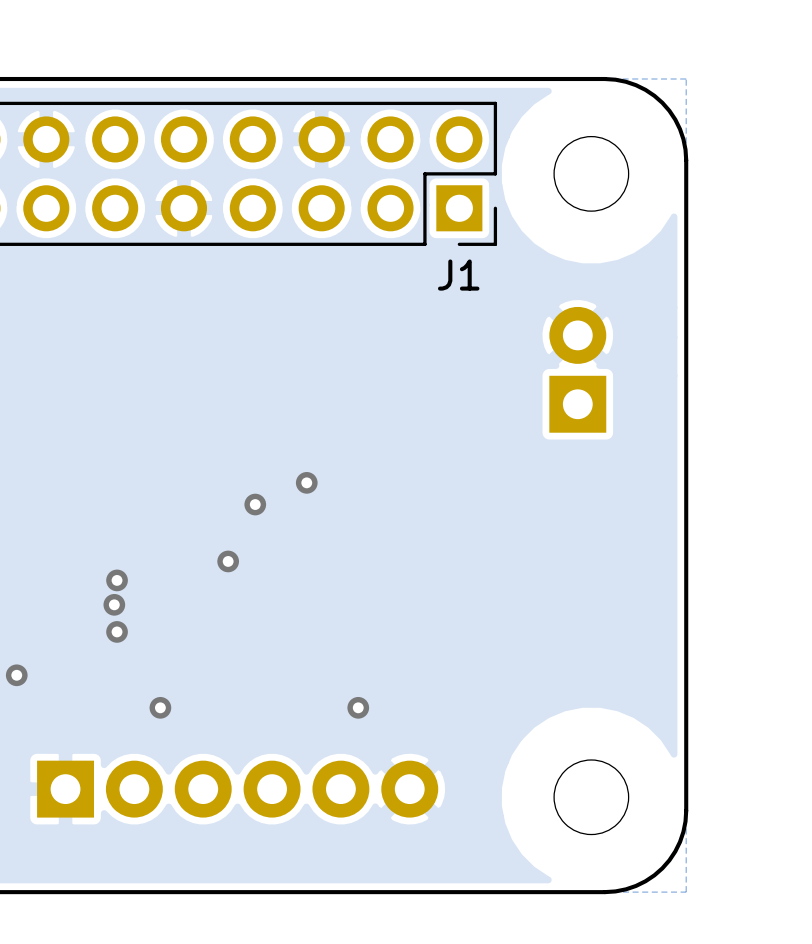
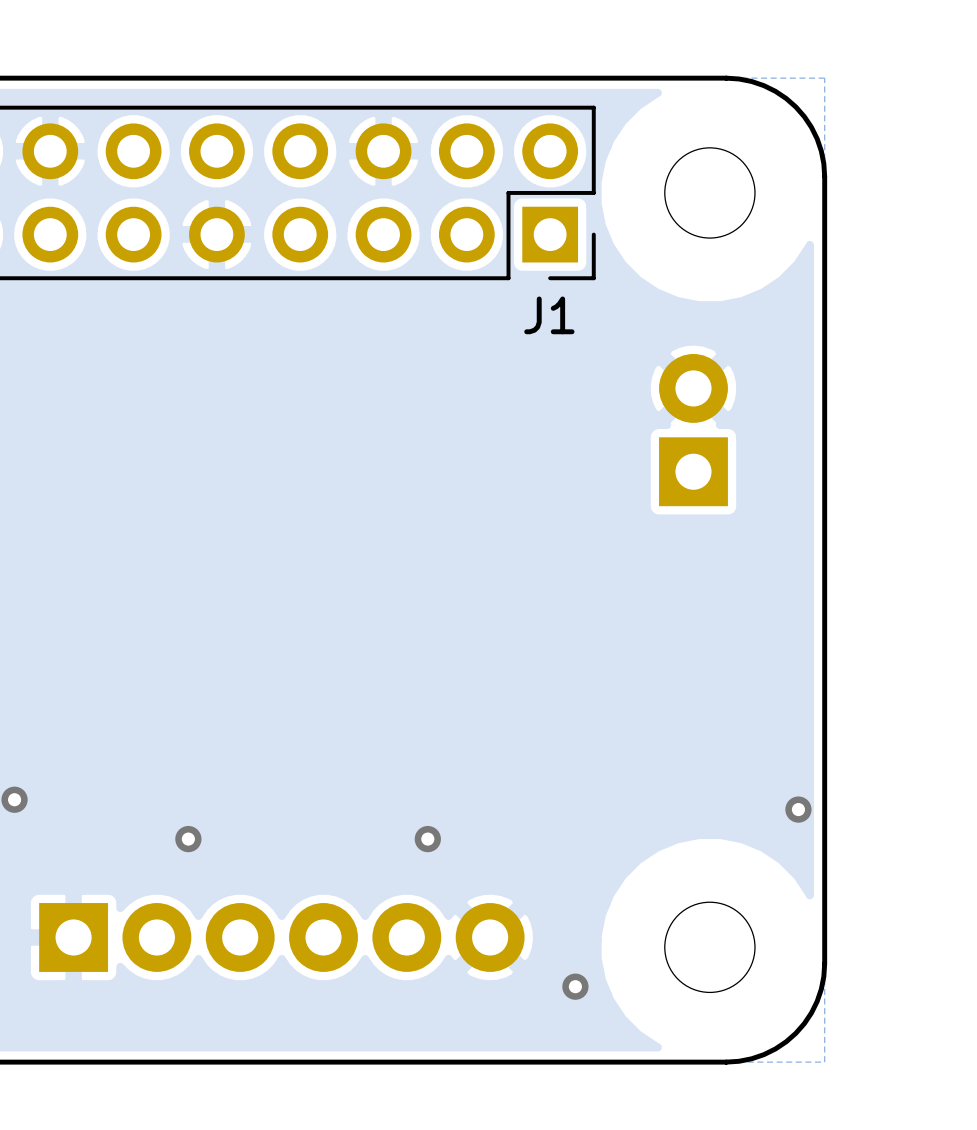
via: (306, 482) -> none
via: (255, 504) -> none
via: (228, 561) -> none
via: (117, 580) -> none
via: (114, 604) -> none
via: (117, 631) -> none
via: none -> (798, 809)
via: none -> (575, 986)

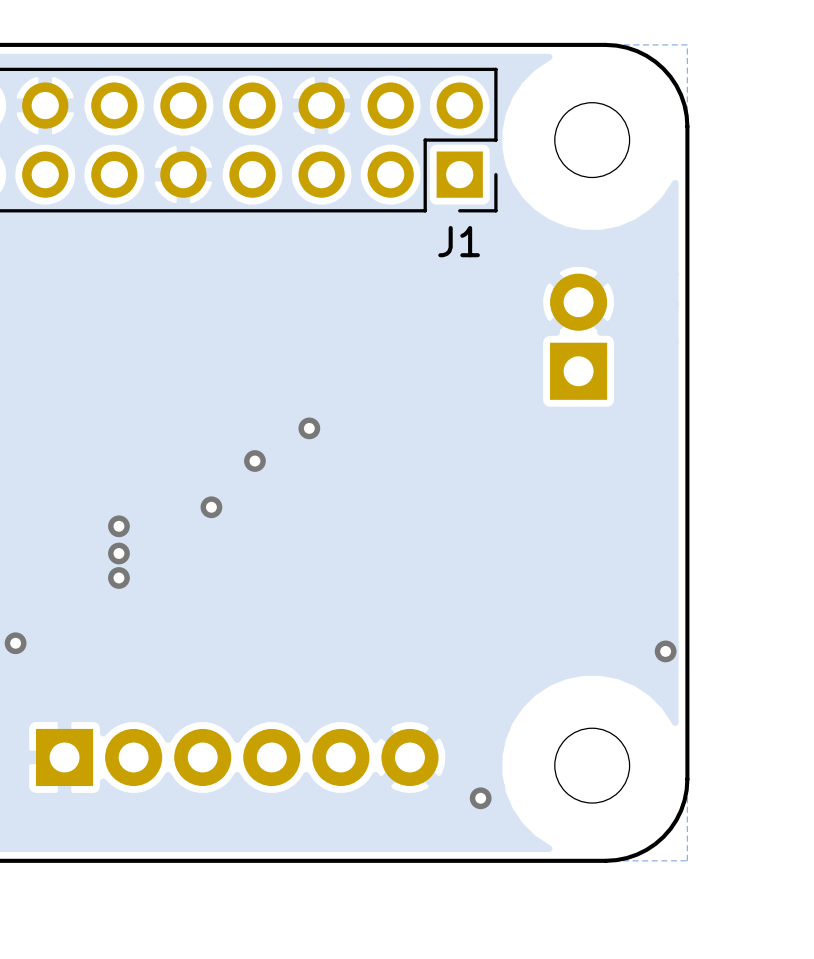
via: none -> (309, 428)
via: none -> (254, 461)
via: none -> (211, 507)
via: none -> (118, 526)
via: none -> (118, 553)
via: none -> (118, 577)
via: (188, 839) -> none
via: (427, 839) -> none

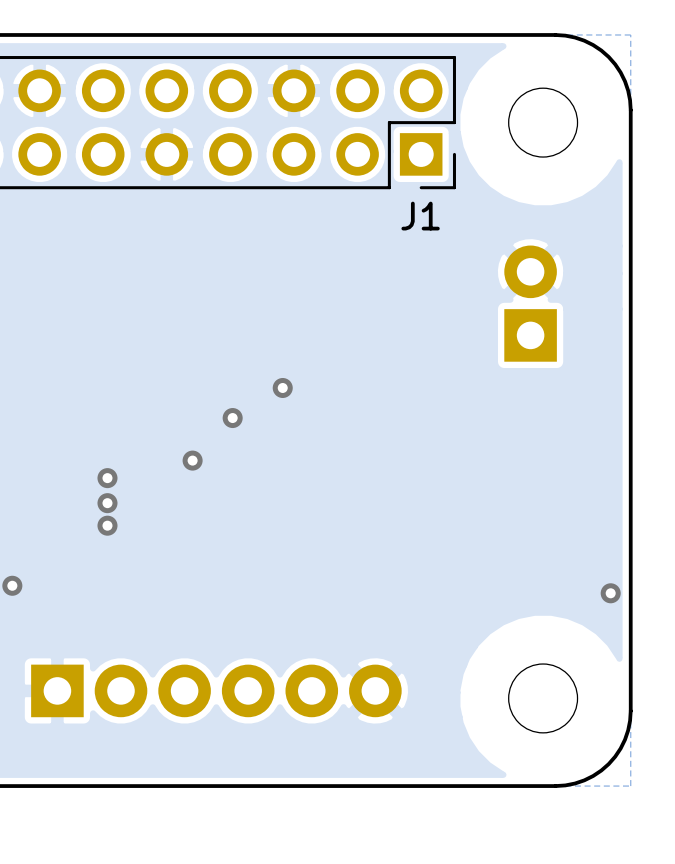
via: (480, 798) -> none

